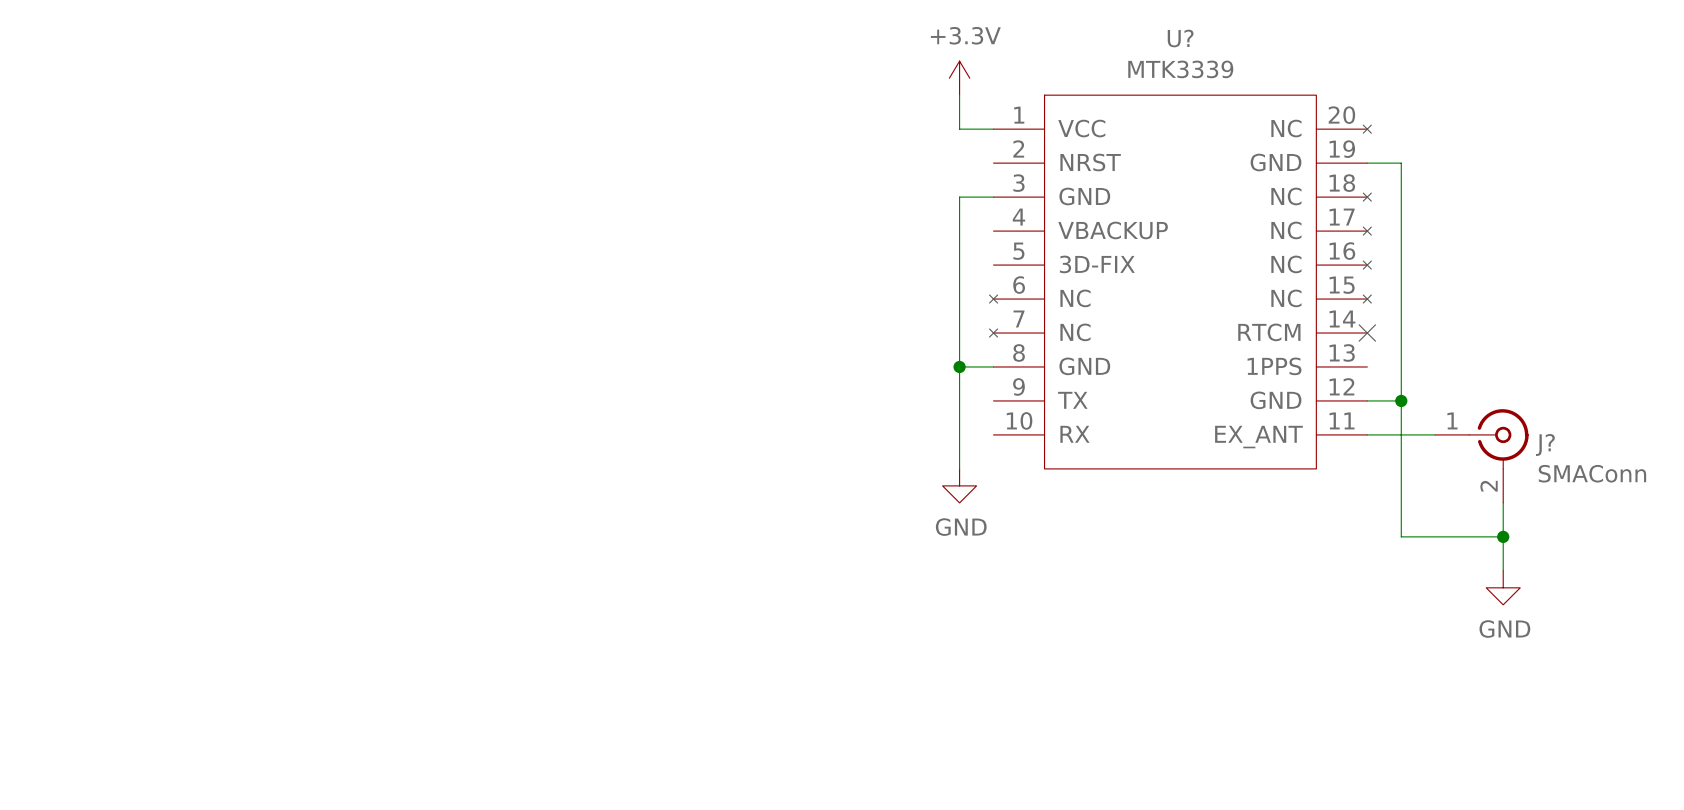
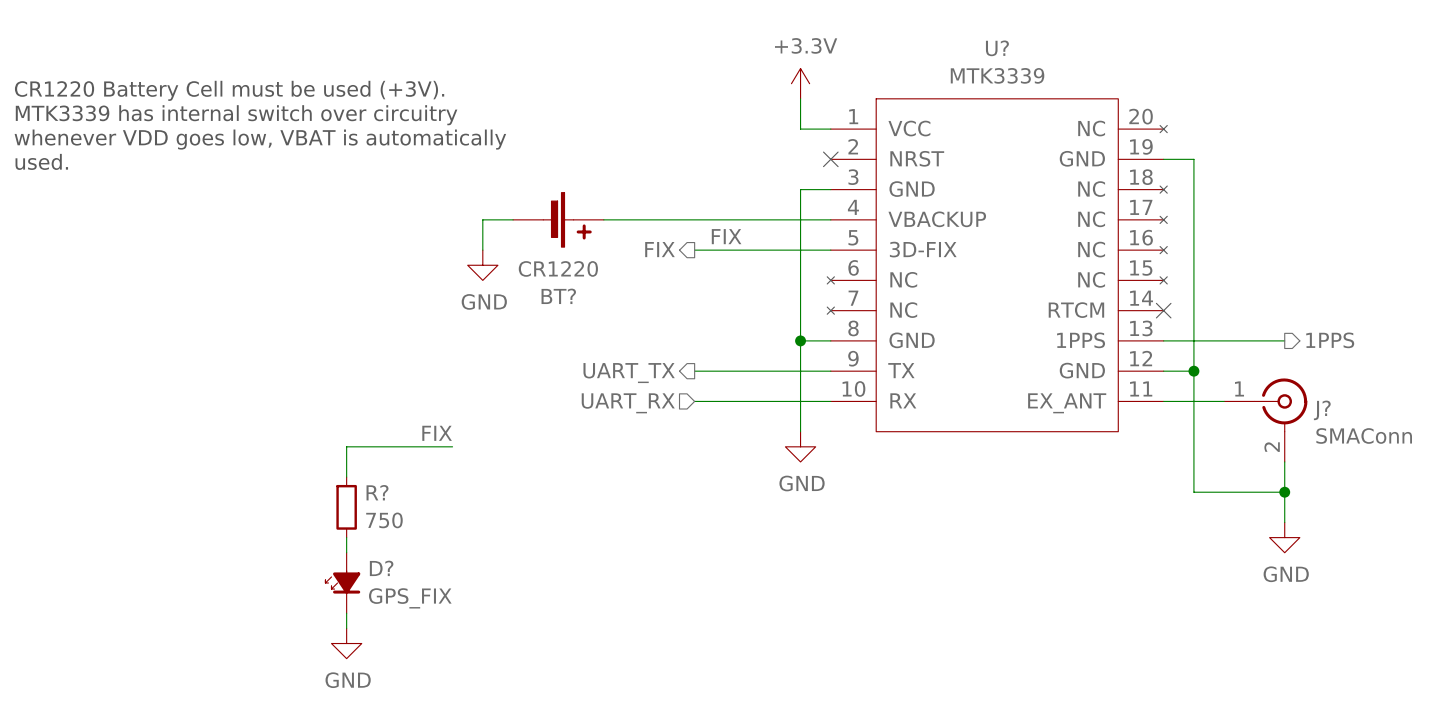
text: none -> CR1220 Battery Cell must be used (+3V). (229, 90)
text: none -> MTK3339 has internal switch over circuitry (236, 115)
text: none -> whenever VDD goes low, VBAT is automatically (260, 139)
no-connect mark: none -> (830, 159)
text: none -> used. (41, 161)
wire: none -> (513, 219) (482, 219) (482, 250)
BT?: none -> CR1220 (558, 219)
wire: none -> (603, 219) (830, 219)
label: none -> FIX (726, 236)
hierarchical label: none -> FIX (659, 249)
wire: none -> (694, 250) (830, 250)
power symbol: none -> GND (482, 265)
wire: none -> (1163, 340) (1284, 340)
hierarchical label: none -> 1PPS (1330, 340)
wire: none -> (694, 371) (830, 371)
hierarchical label: none -> UART_TX (629, 373)
wire: none -> (694, 401) (830, 401)
hierarchical label: none -> UART_RX (628, 403)
label: none -> FIX (437, 433)
wire: none -> (452, 446) (346, 446) (346, 477)
R?: none -> 750 (346, 507)
wire: none -> (346, 537) (346, 552)
D?: none -> GPS_FIX (342, 583)
wire: none -> (346, 613) (346, 628)
power symbol: none -> GND (346, 643)

